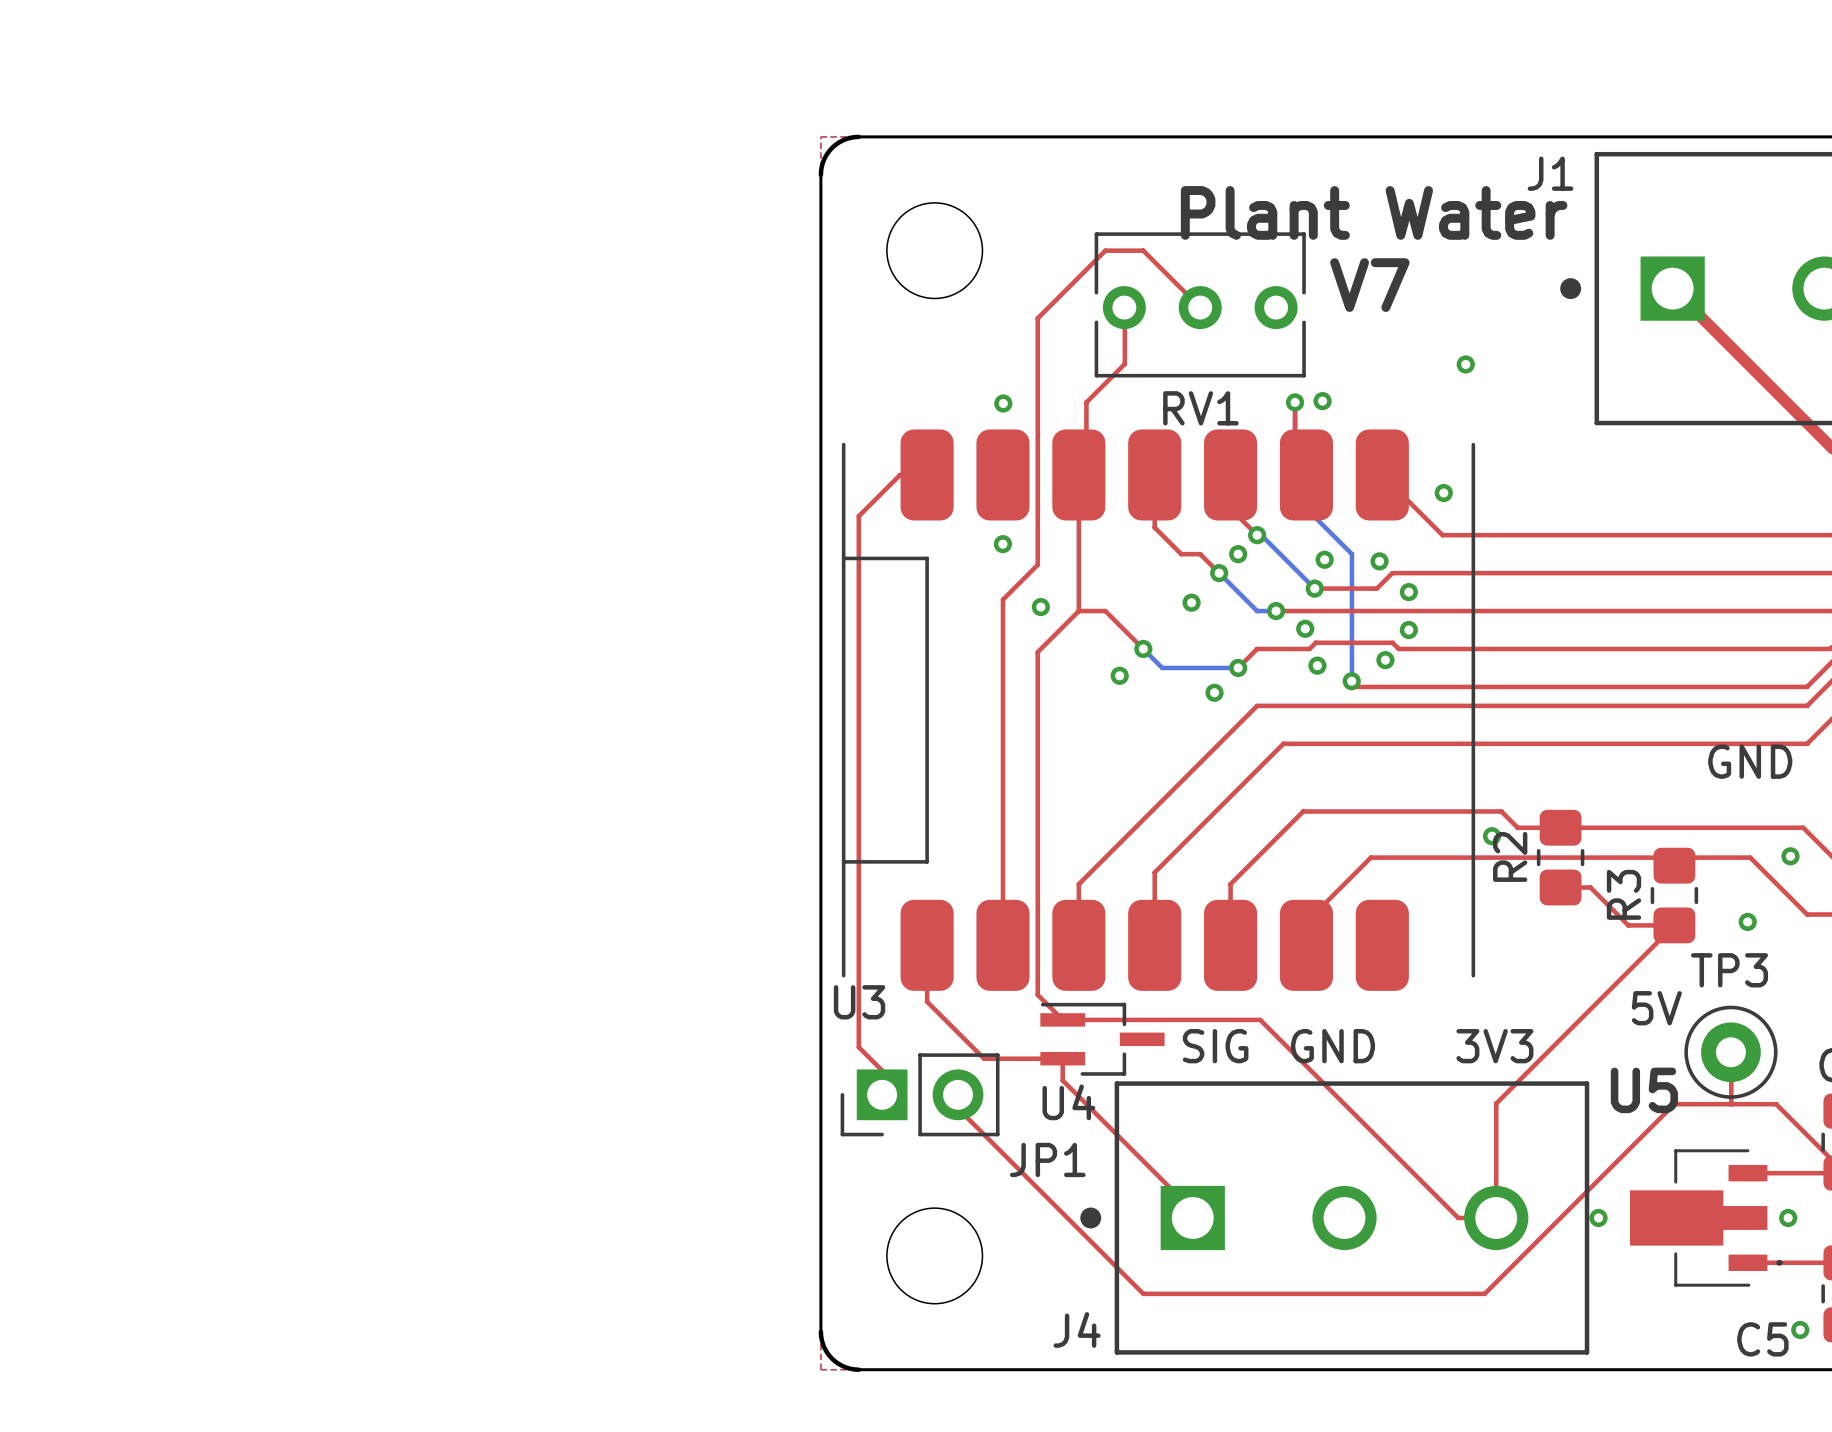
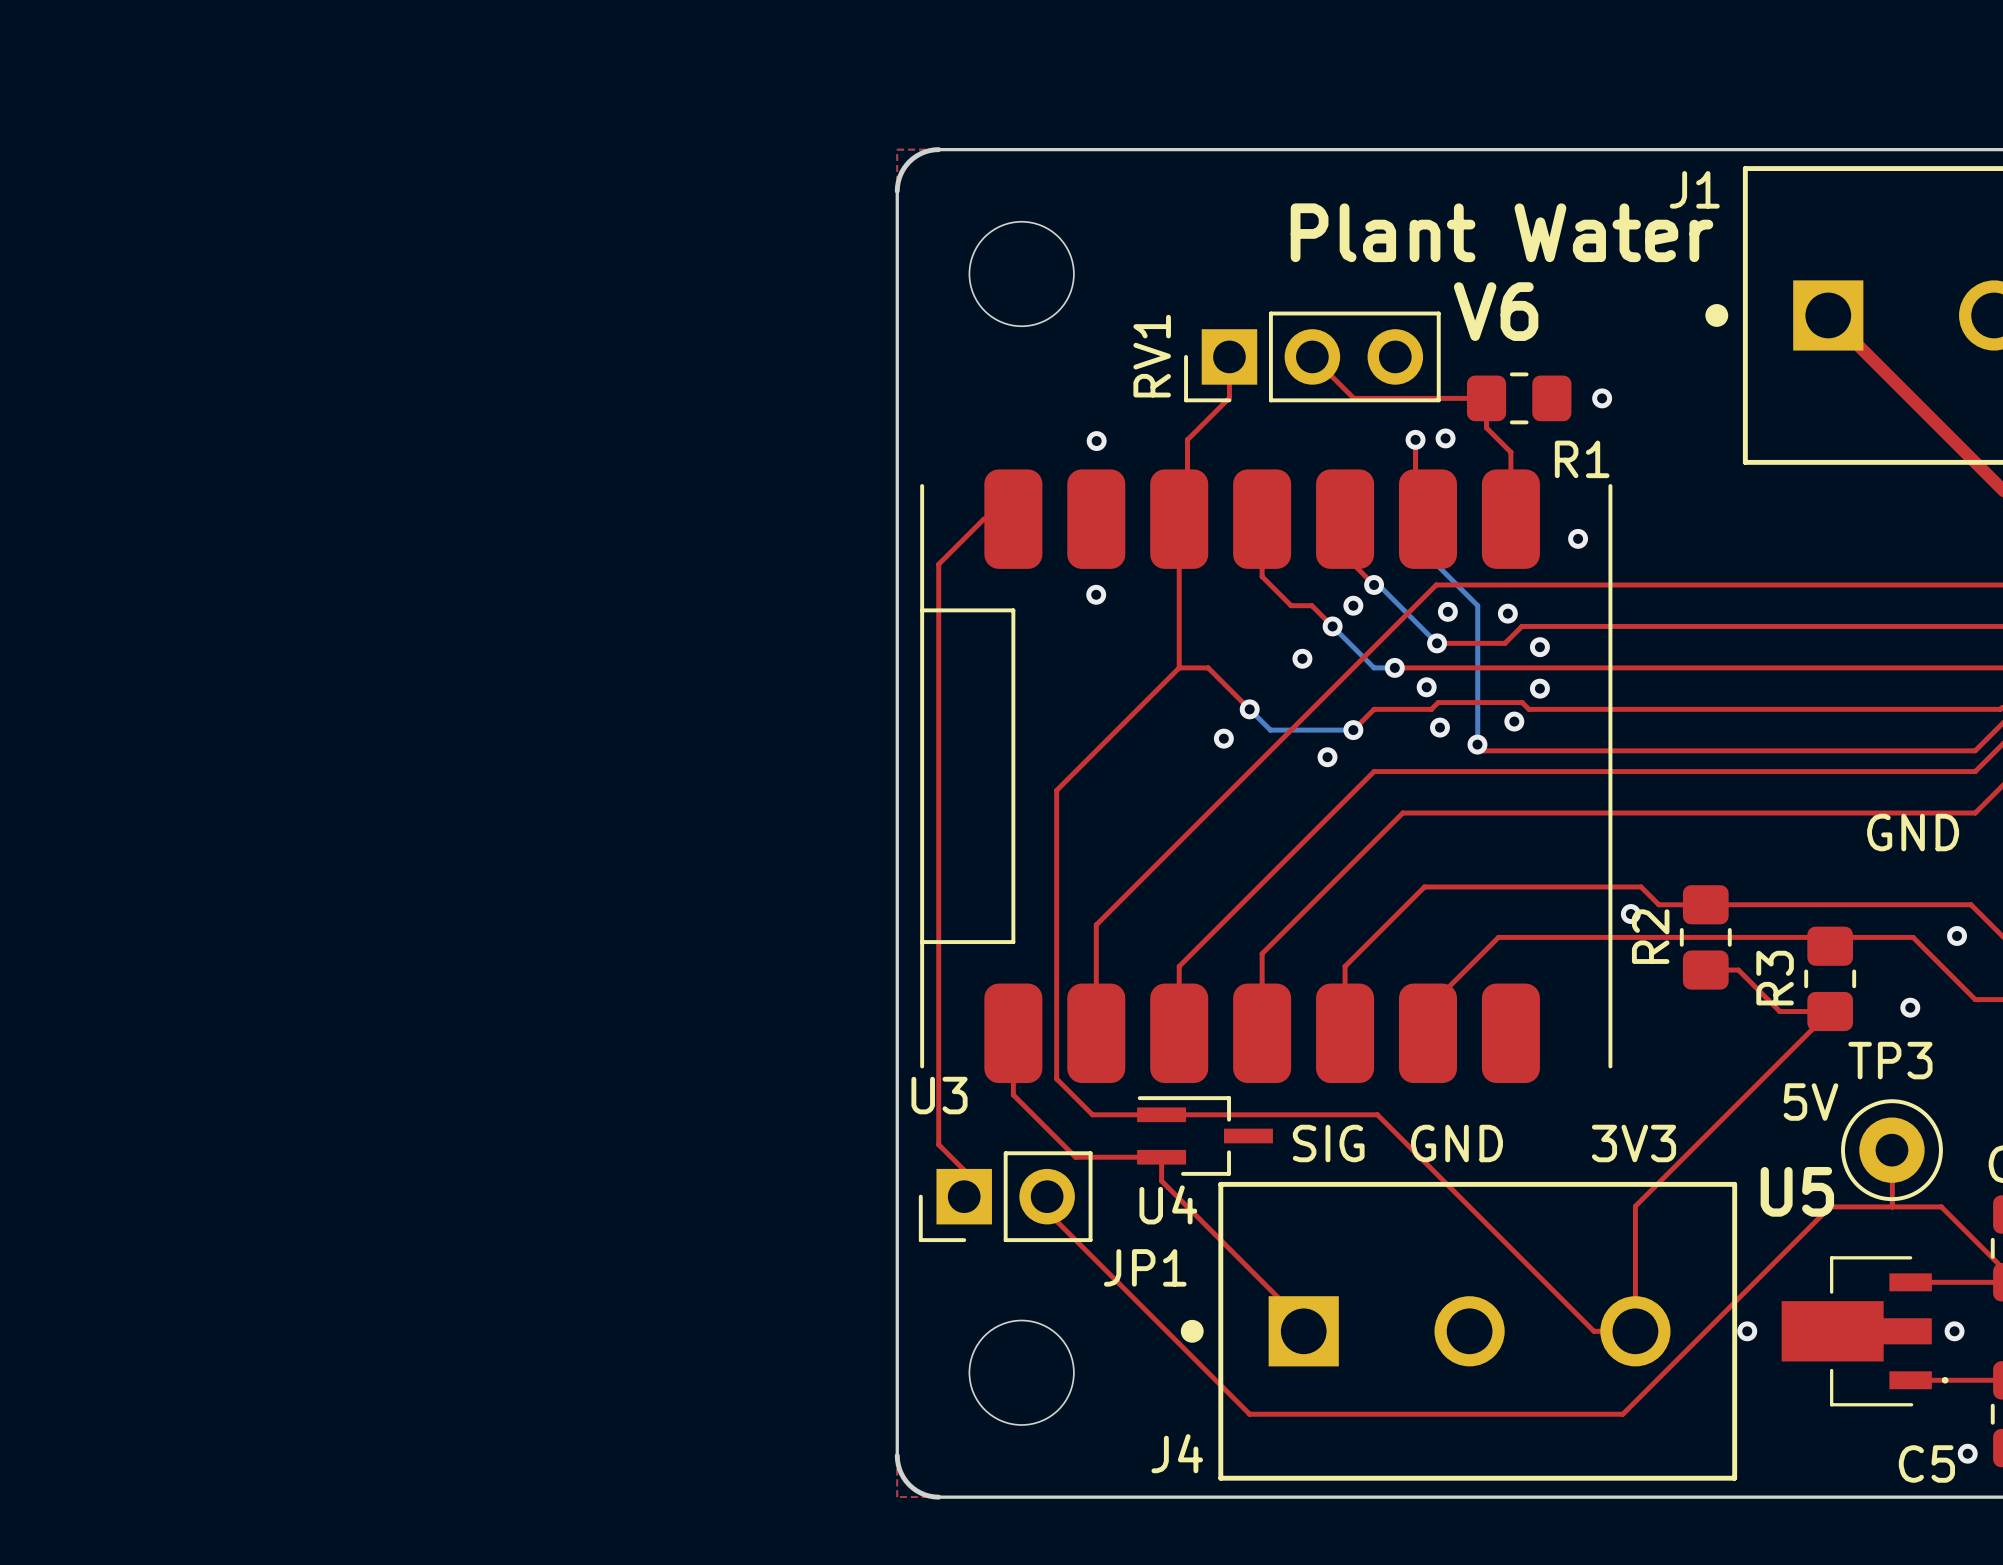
RV1 footprint: [1094, 232, 1306, 378] -> [1184, 311, 1441, 403]
text: V7 (1369, 285) -> V6 (1496, 311)
top track: (1200, 307) (1143, 250) (1105, 250) (1037, 318) (1037, 564) (1002, 599) (1002, 846) -> (1576, 584) (1436, 584) (1096, 924)
R1: none -> (1519, 398)
RV1 name position: RV1 (1200, 408) -> RV1 (1152, 356)
top track: (1382, 474) (1442, 535) -> (1510, 519) (1510, 452) (1486, 427) (1486, 398) (1353, 398) (1312, 356)
via: (1040, 607) -> none
top track: (1037, 652) (1037, 994) (1062, 1019) -> (1134, 712) (1056, 790) (1056, 1078) (1092, 1114) (1161, 1114)

